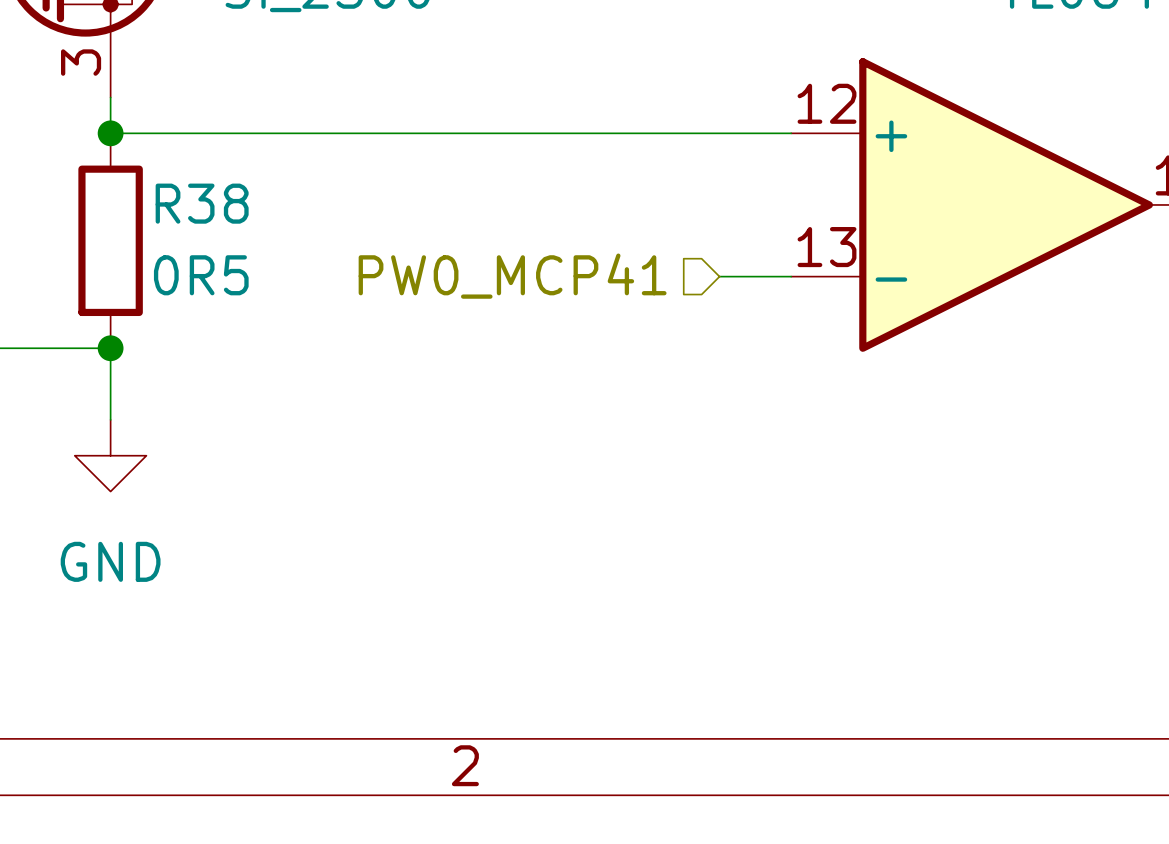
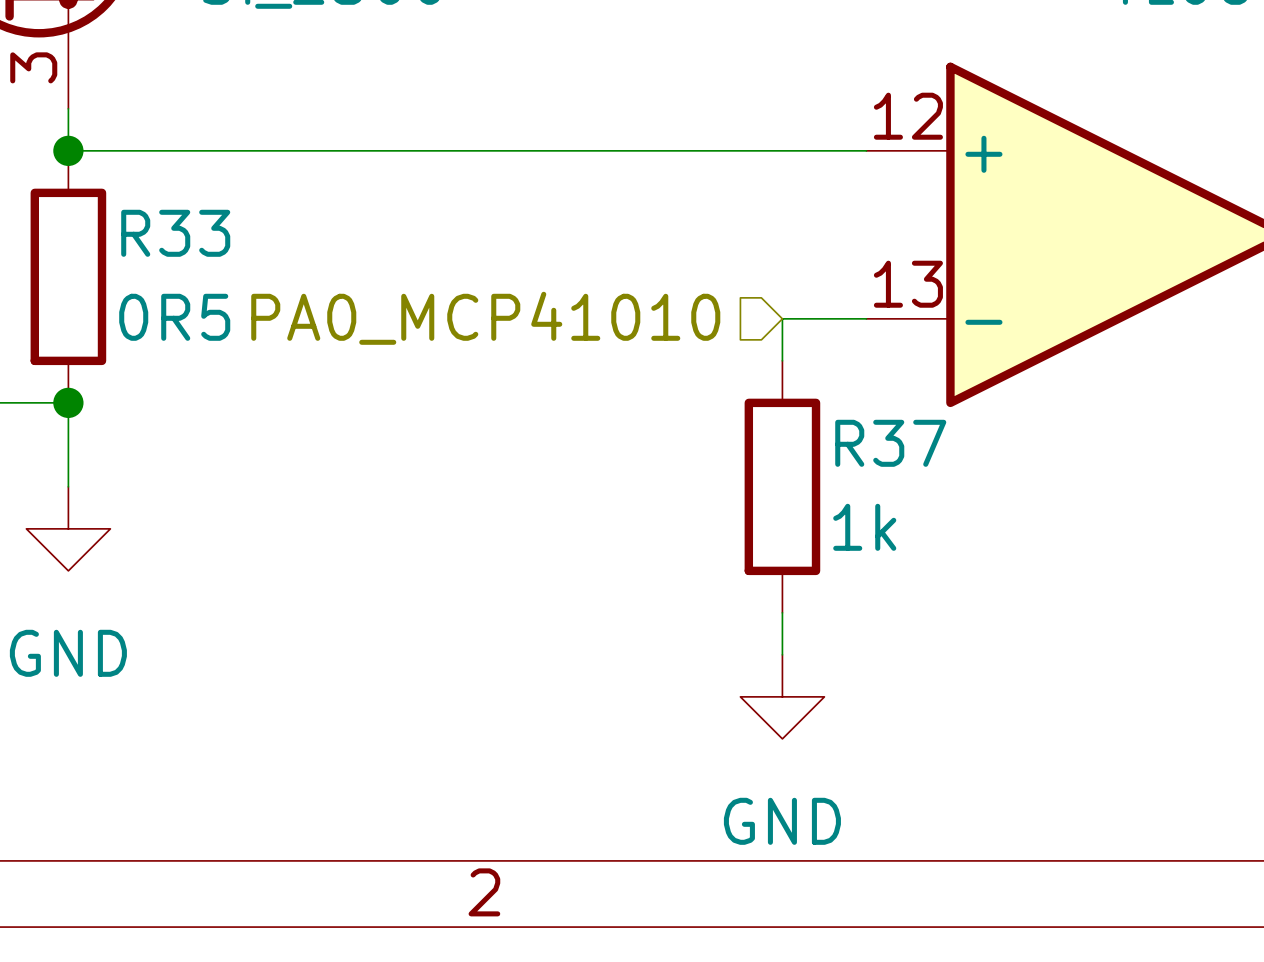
R38 name: R38 (202, 203) -> R33 (175, 233)
hierarchical label: PW0_MCP41 (512, 276) -> PA0_MCP41010 (485, 318)
wire: none -> (782, 318) (782, 360)
R37: none -> 1k (782, 486)
wire: none -> (782, 612) (782, 654)
power symbol: none -> GND (782, 696)

